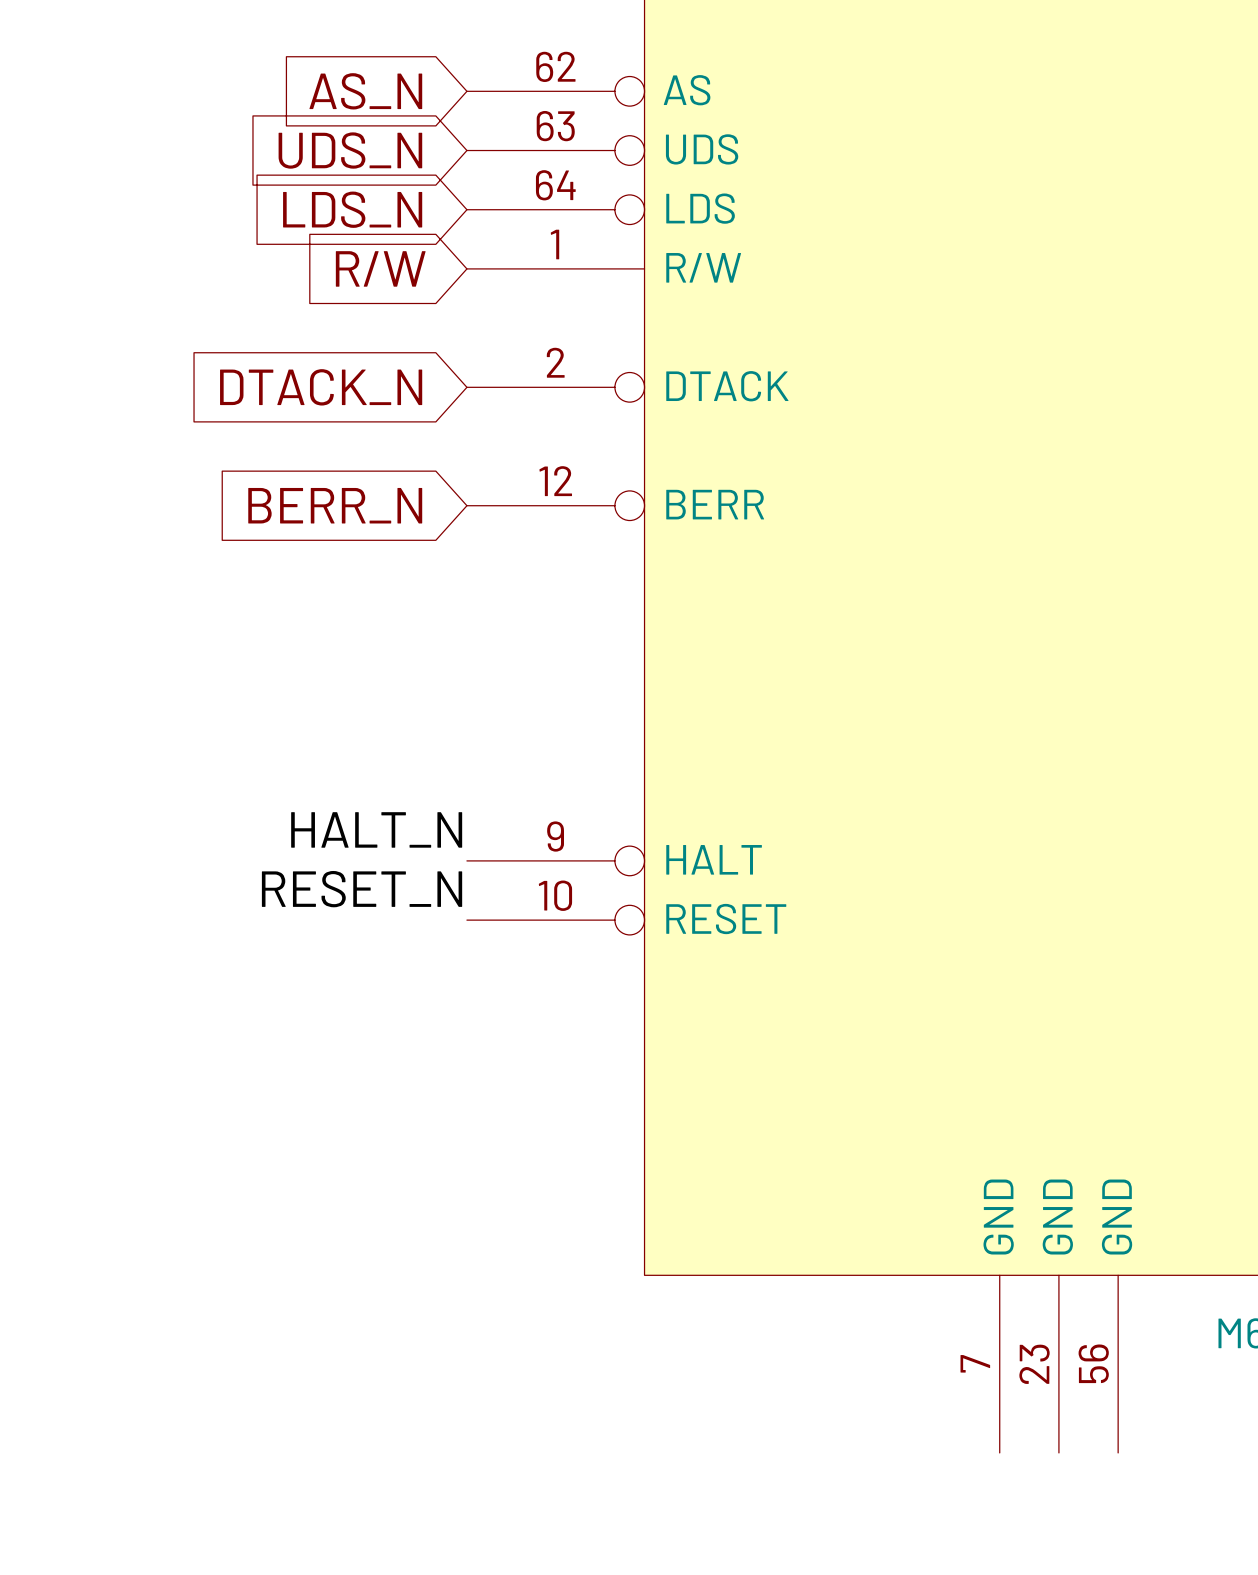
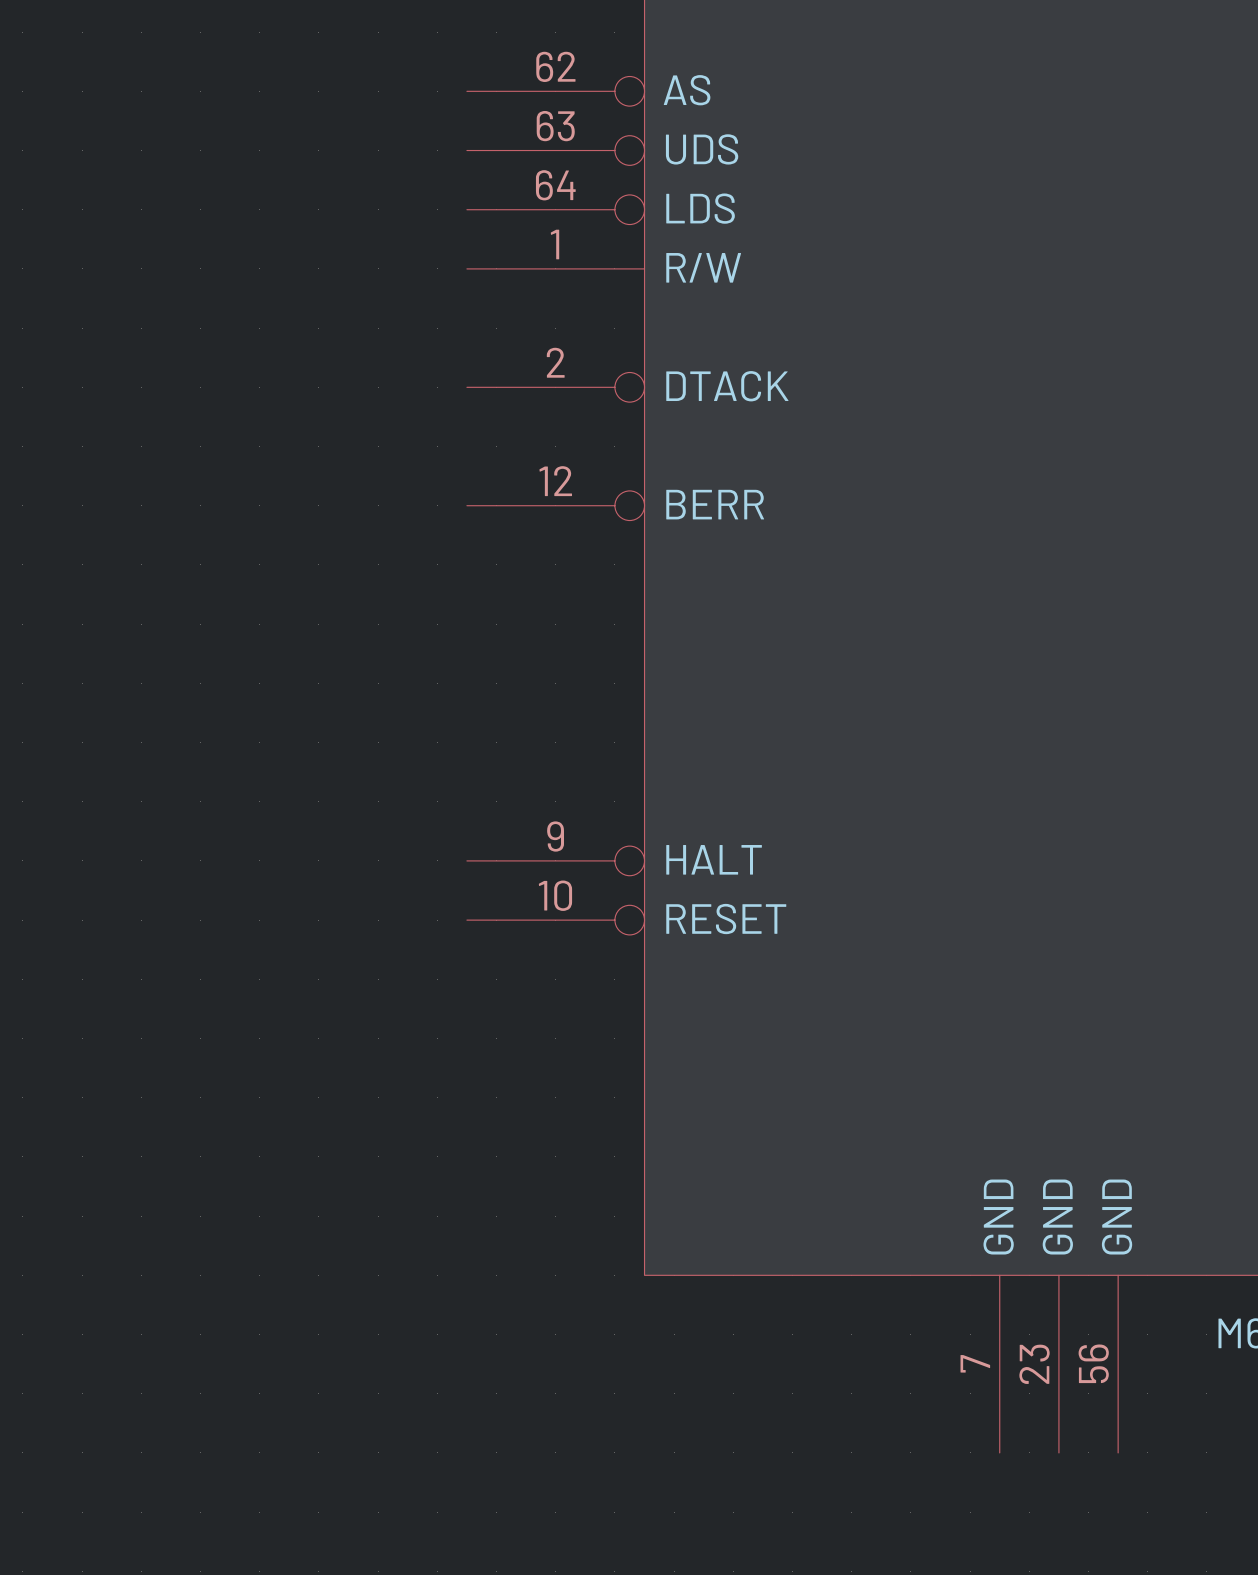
global label: AS_N (365, 91) -> none
global label: UDS_N (350, 150) -> none
global label: LDS_N (352, 209) -> none
global label: R/W (380, 268) -> none
global label: DTACK_N (321, 387) -> none
global label: BERR_N (335, 505) -> none
label: HALT_N (376, 829) -> none
label: RESET_N (362, 889) -> none

